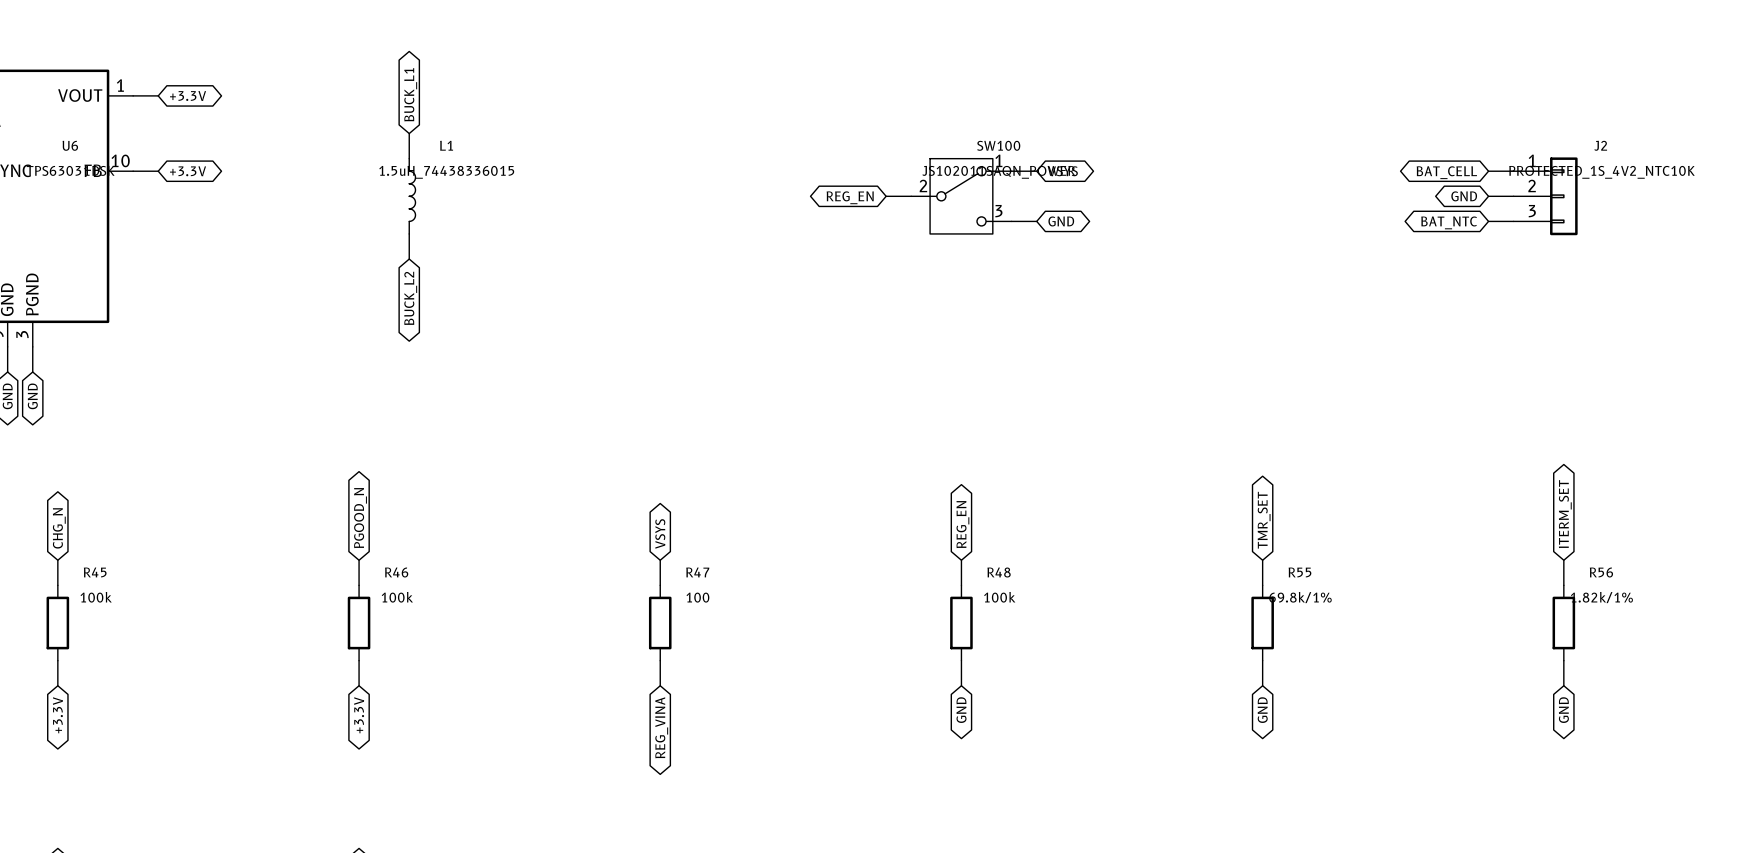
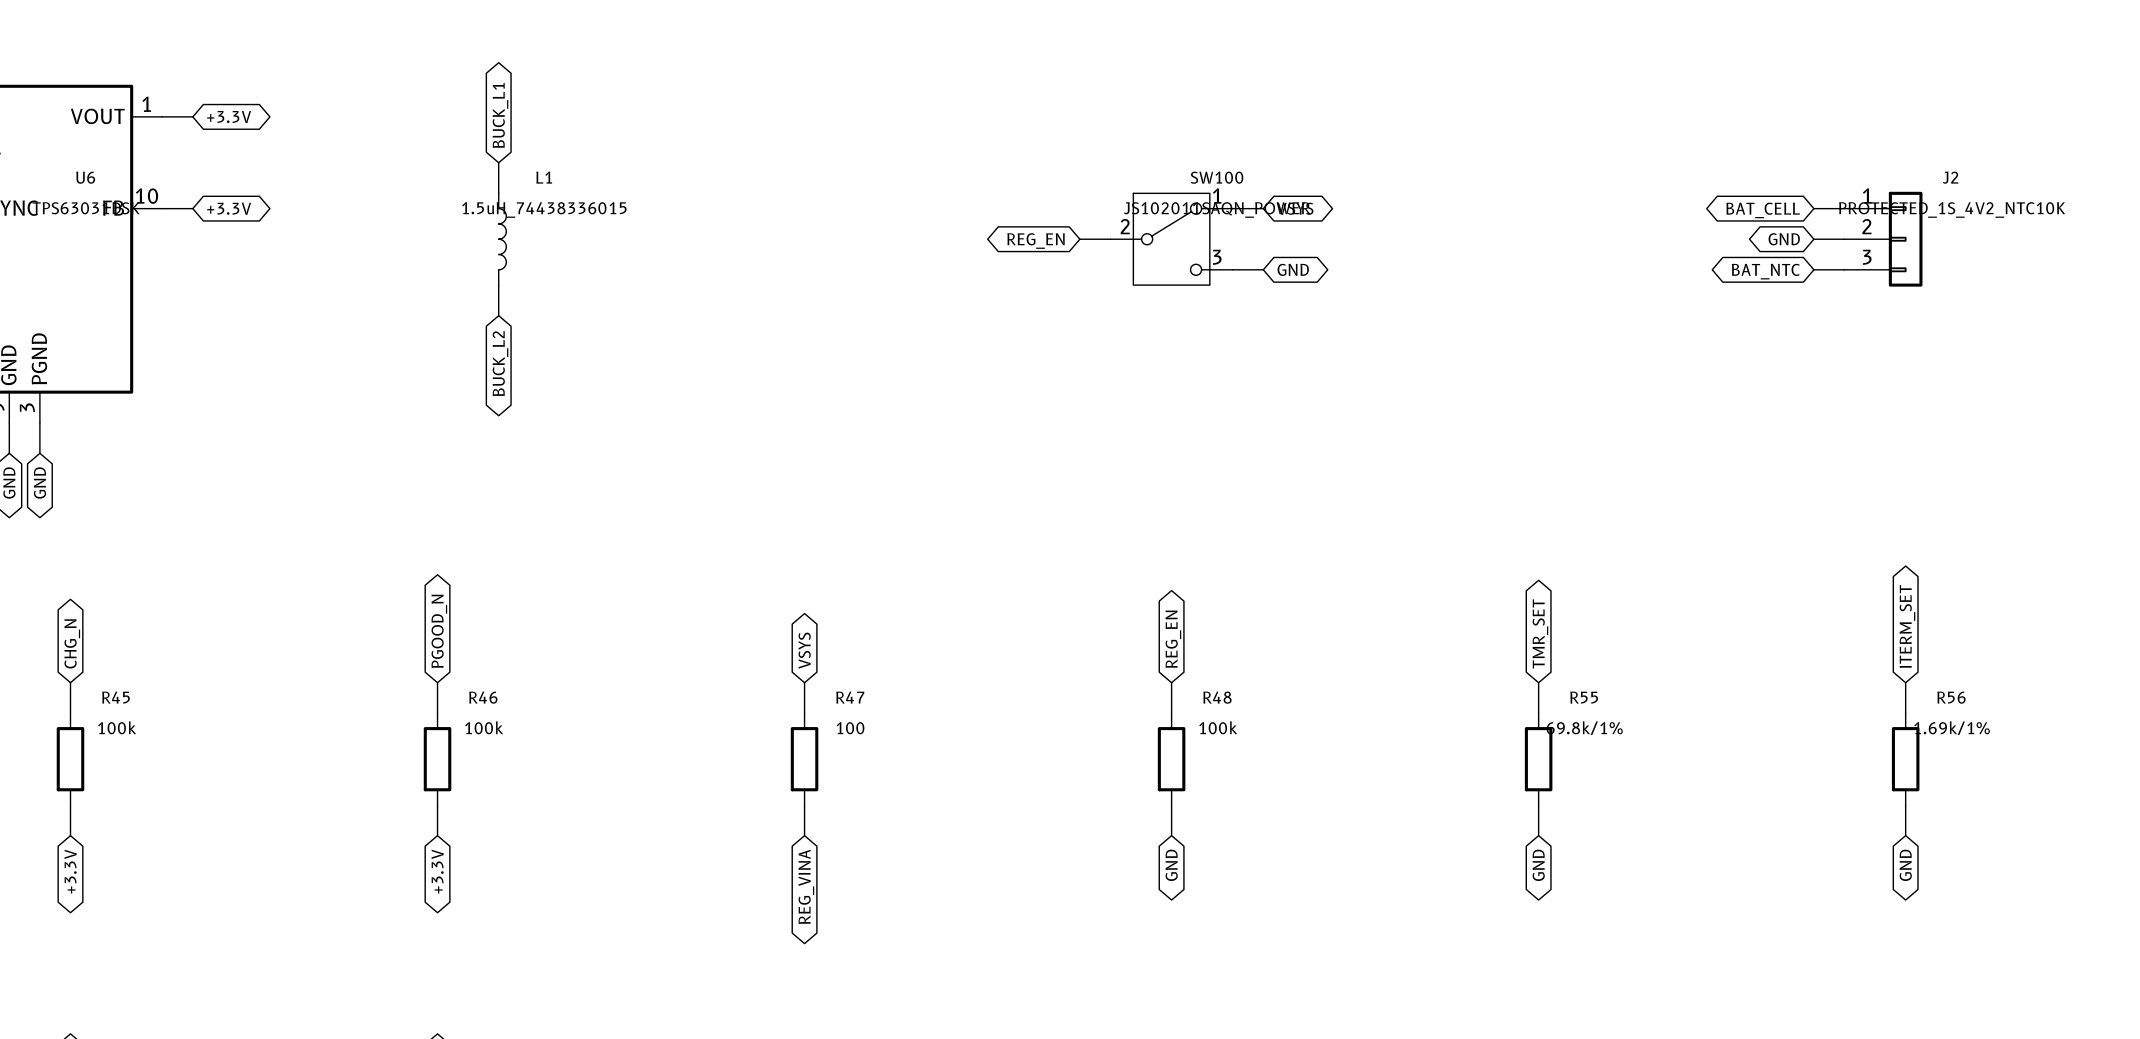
R56 value: 1.82k/1% (1601, 597) -> 1.69k/1% (1952, 728)

